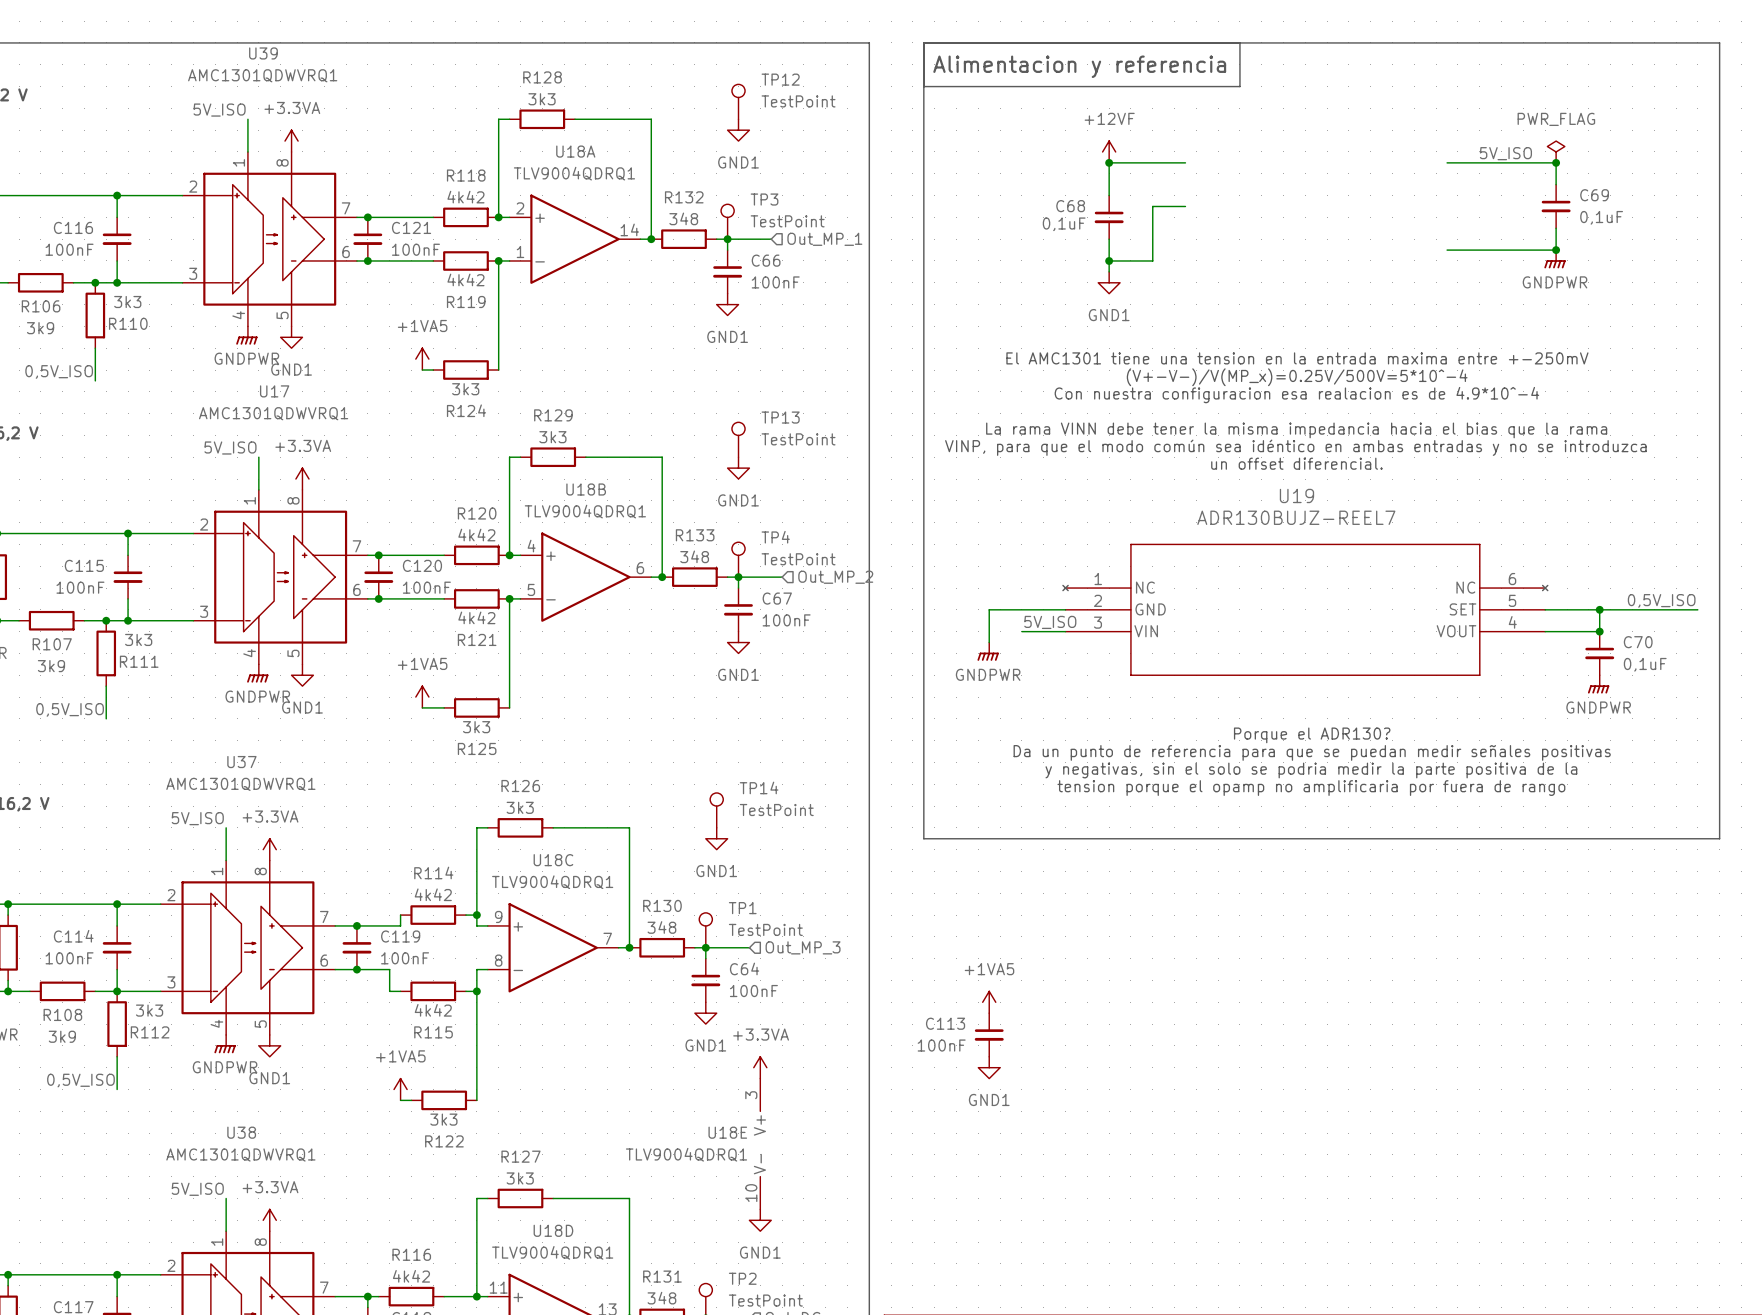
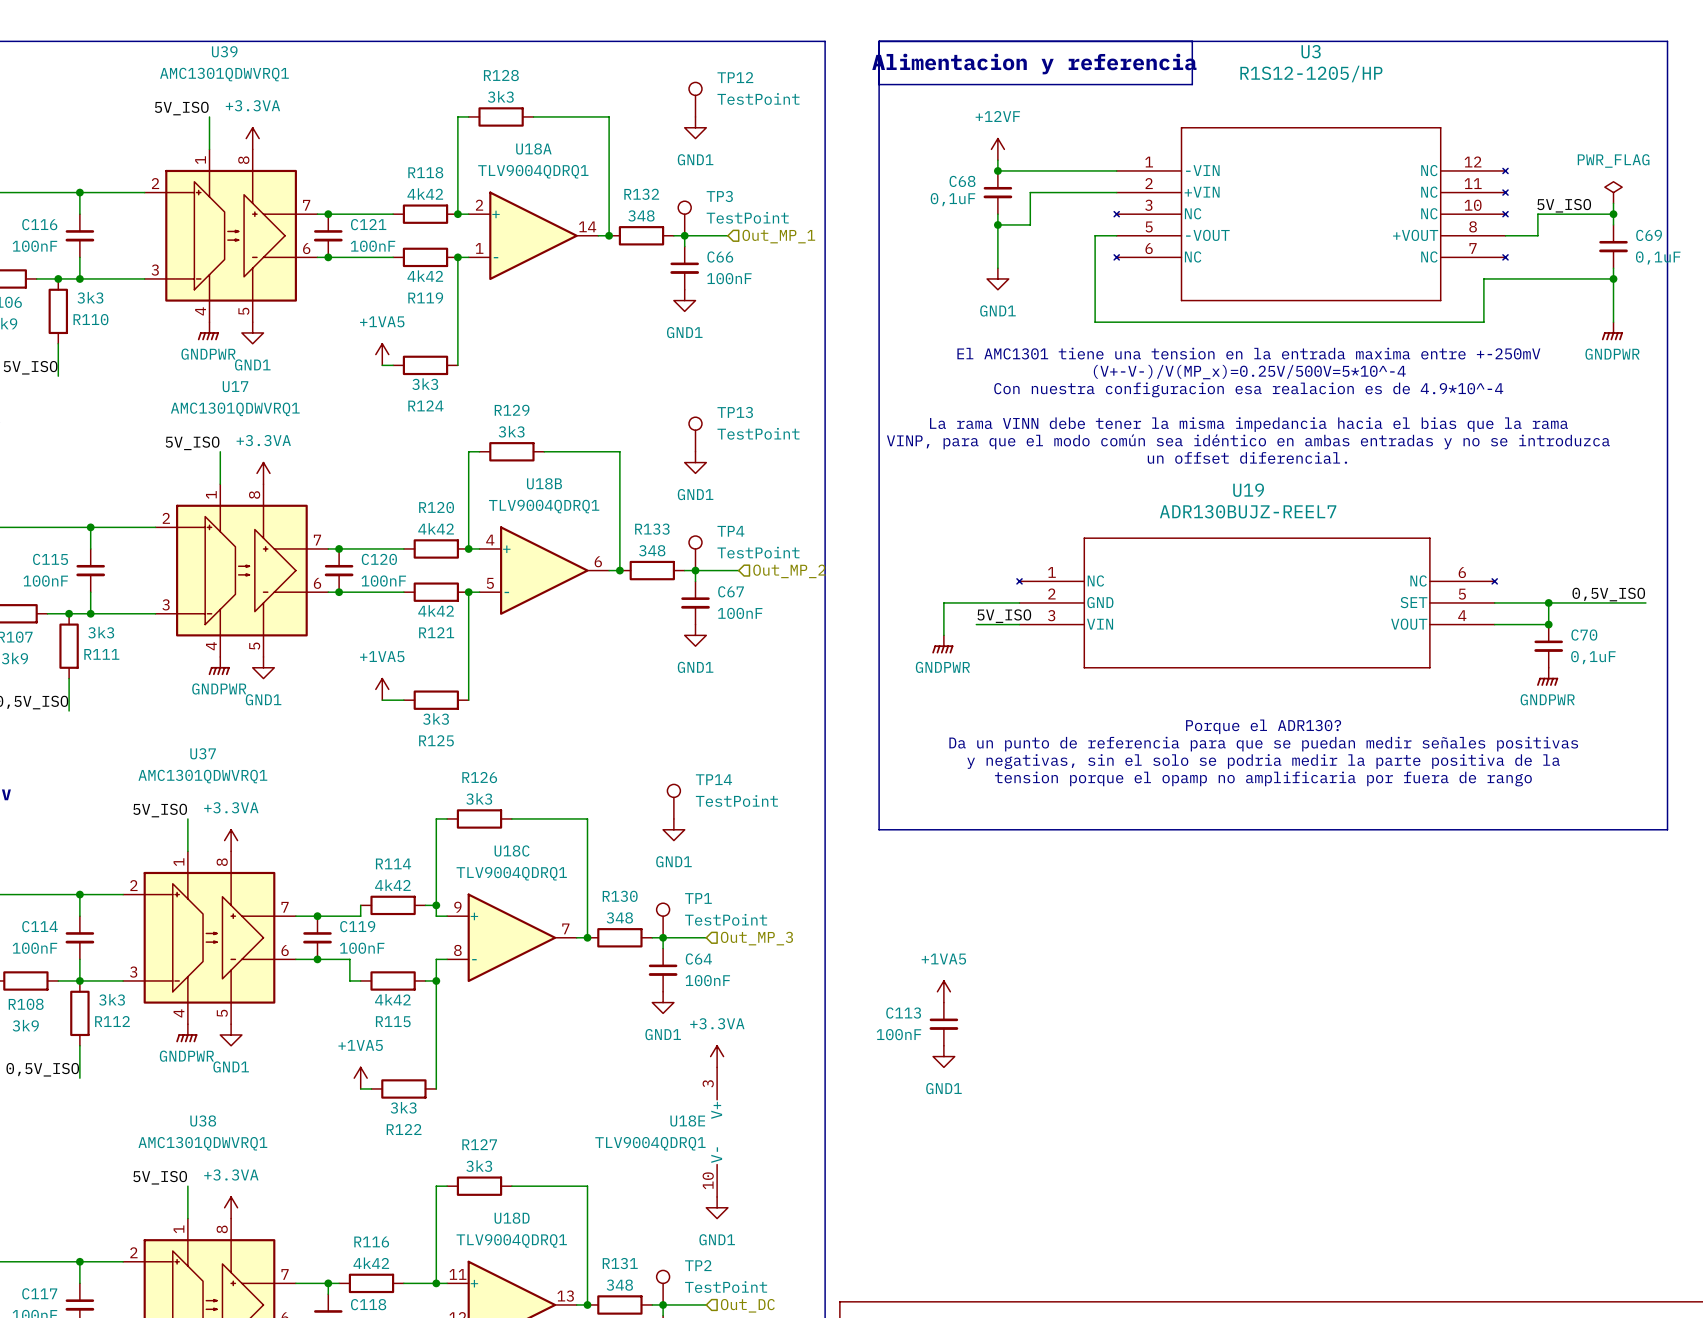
power symbol position: +12VF (1109, 151) -> +12VF (997, 149)
power symbol position: PWR_FLAG (1556, 151) -> PWR_FLAG (1613, 192)
label position: 5V_ISO (1505, 153) -> 5V_ISO (1564, 205)
wire: none -> (997, 160) (997, 170) (1116, 170)
junction: (1109, 162) -> none
wire: (1185, 162) (1109, 162) (1109, 195) -> none
wire: (1447, 162) (1556, 162) (1556, 184) -> none
junction: (1556, 162) -> none
junction: none -> (997, 170)
wire: none -> (1116, 192) (1030, 192) (1030, 224) (997, 224)
wire: (1185, 206) (1152, 206) (1152, 260) (1109, 260) -> none
C69 position: (1556, 206) -> (1613, 246)
wire: none -> (1613, 203) (1613, 224)
wire: none -> (997, 214) (997, 268)
C68 position: (1109, 217) -> (997, 192)
U3: none -> R1S12-1205/HP (1311, 214)
wire: none -> (1613, 214) (1537, 214) (1537, 235) (1505, 235)
junction: none -> (1613, 214)
junction: none -> (997, 224)
wire: (1556, 228) (1556, 250) (1447, 250) -> none
wire: (1109, 239) (1109, 271) -> none
wire: none -> (1116, 235) (1095, 235) (1095, 322) (1483, 322) (1483, 278) (1613, 278)
junction: (1556, 250) -> none
power symbol position: GNDPWR (1555, 259) -> GNDPWR (1612, 331)
junction: (1109, 260) -> none
wire: none -> (1613, 268) (1613, 322)
power symbol position: GND1 (1109, 282) -> GND1 (997, 278)
junction: none -> (1613, 278)

